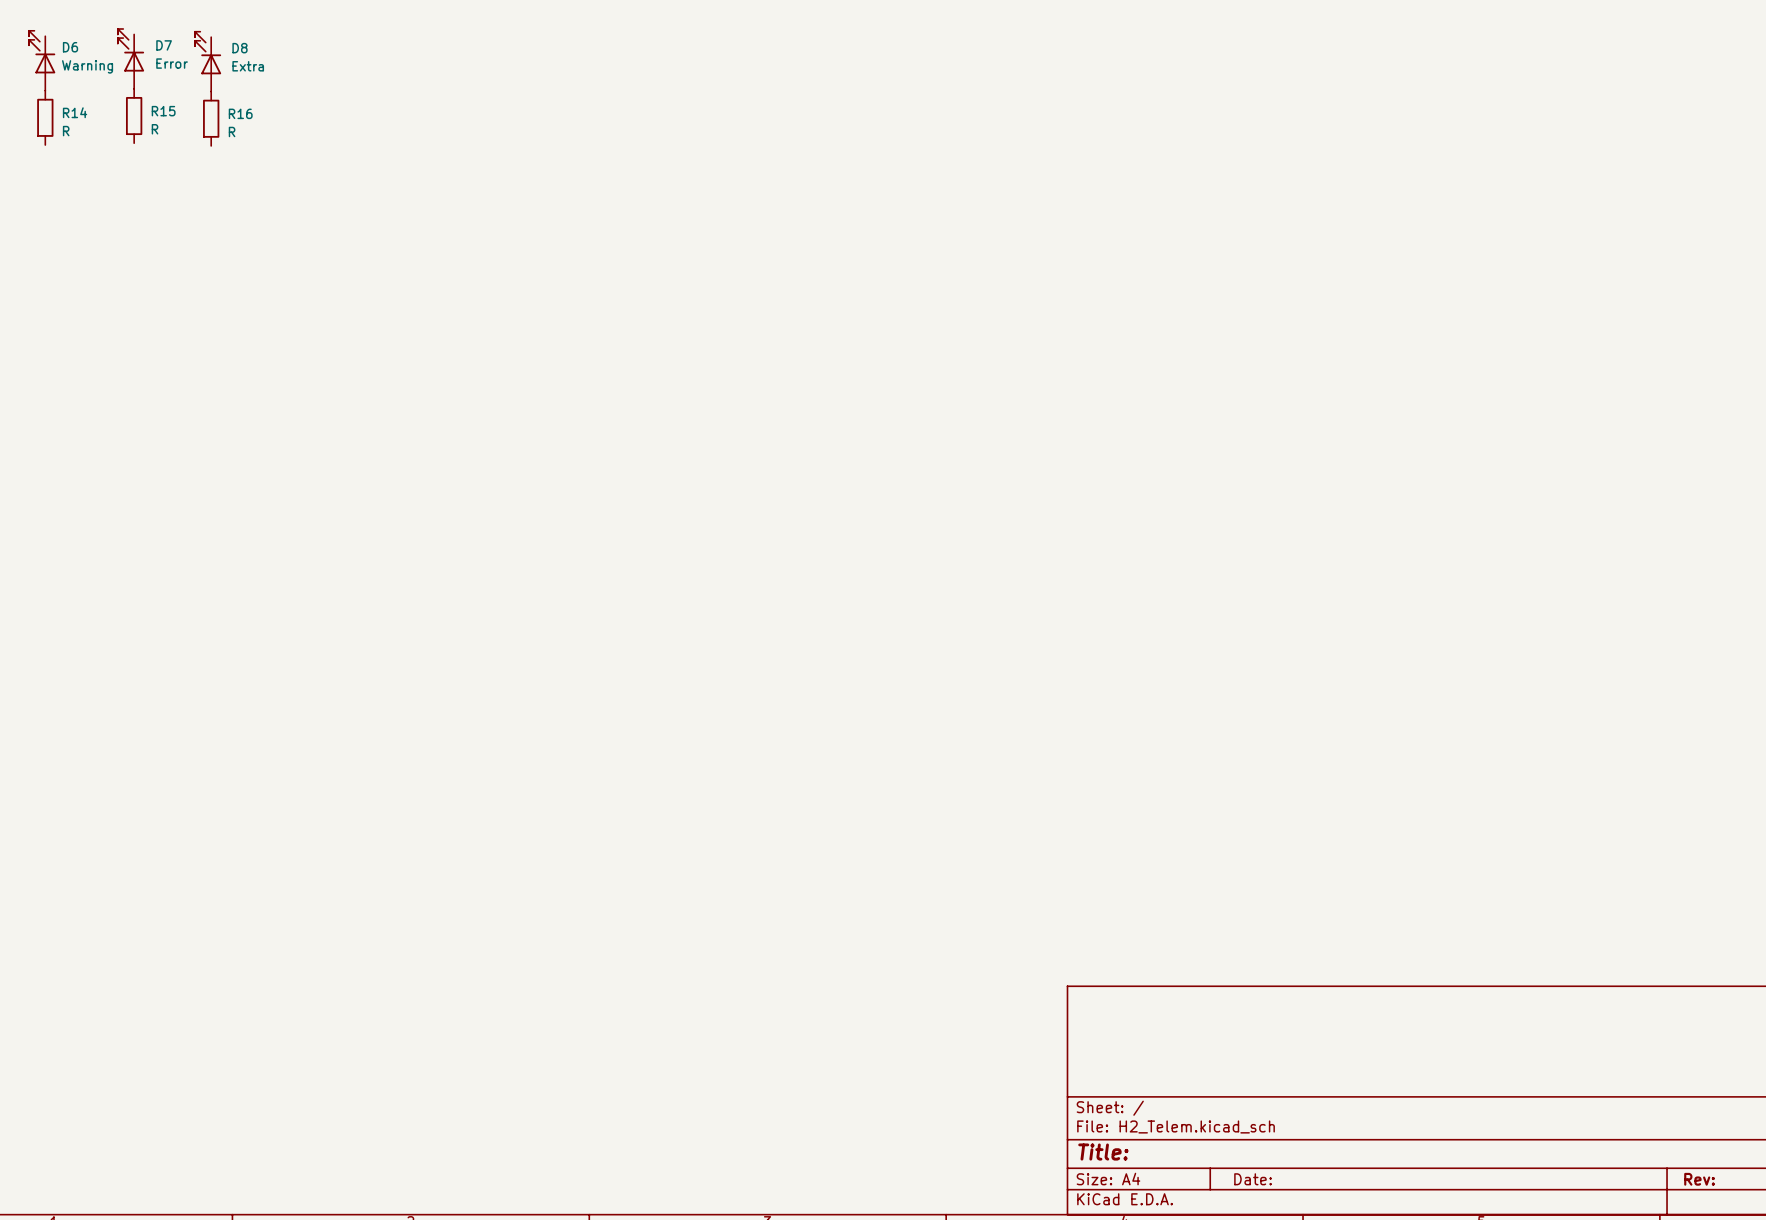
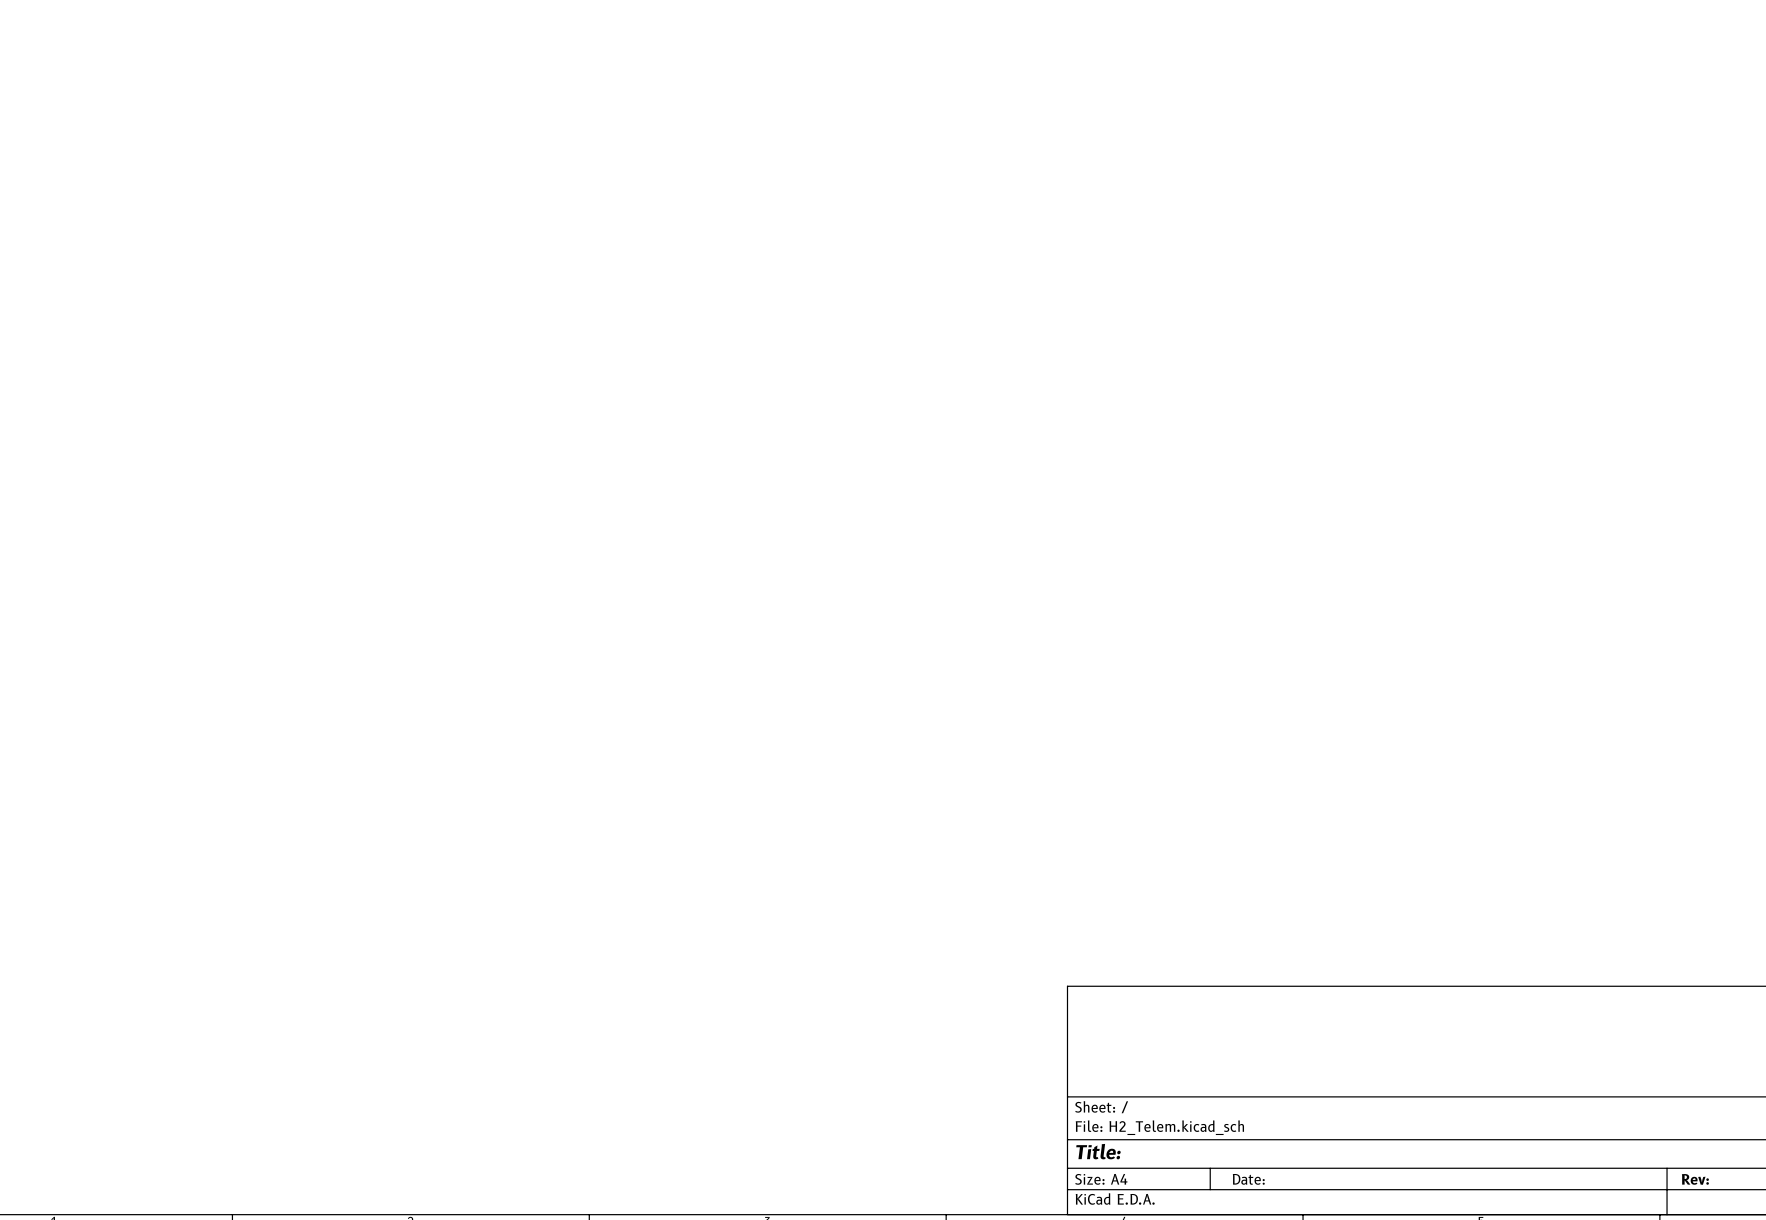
D7: Error (130, 58) -> none
D6: Warning (42, 60) -> none
D8: Extra (208, 61) -> none
R15: R (134, 116) -> none
R14: R (45, 117) -> none
R16: R (211, 118) -> none

